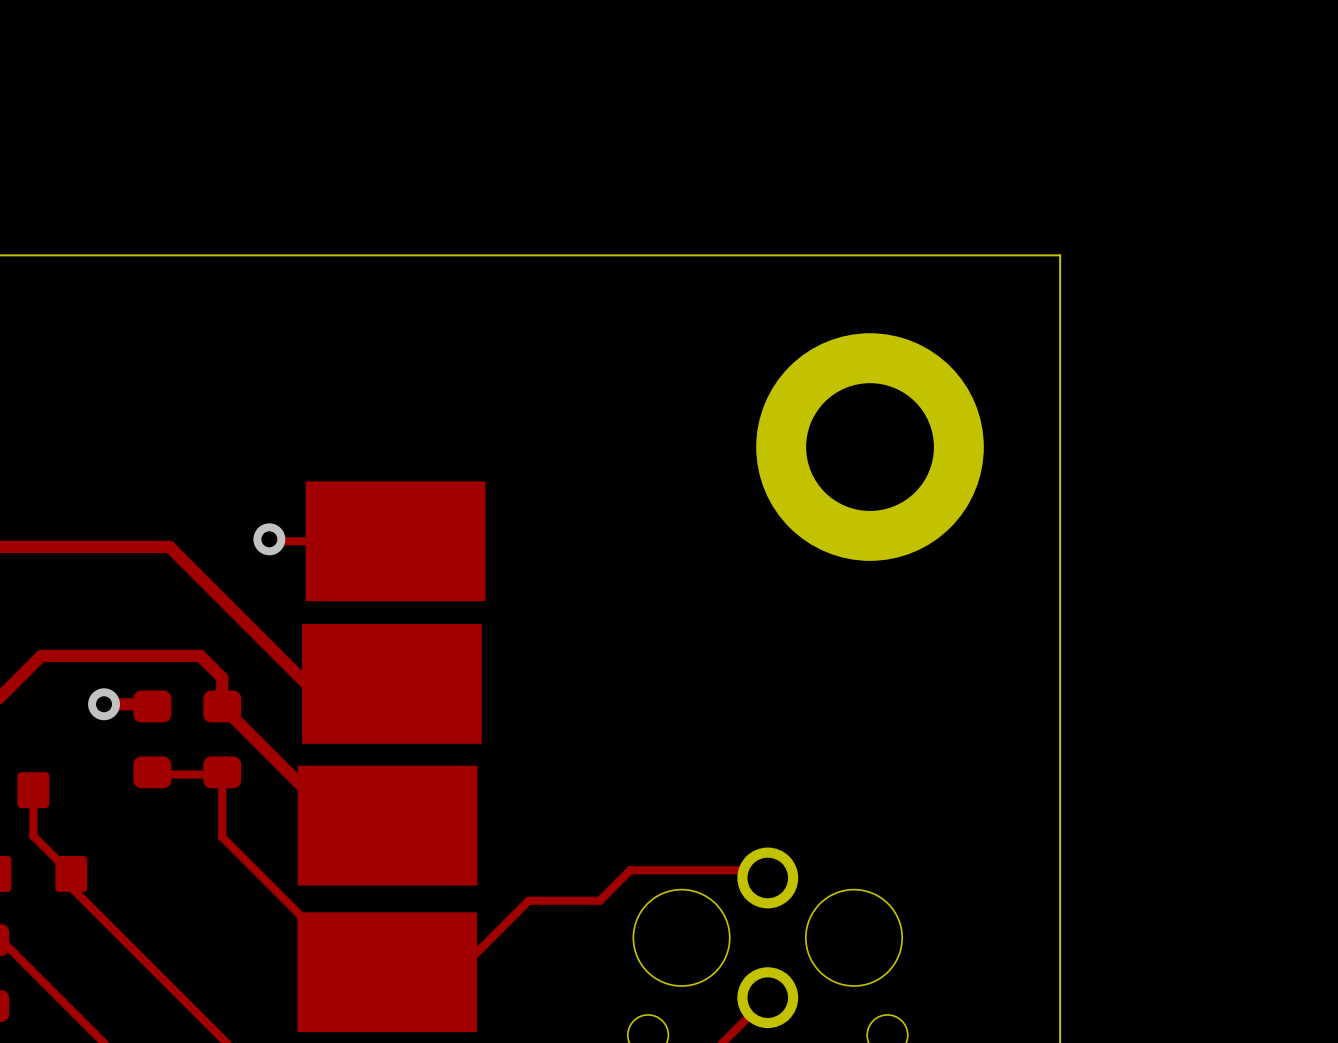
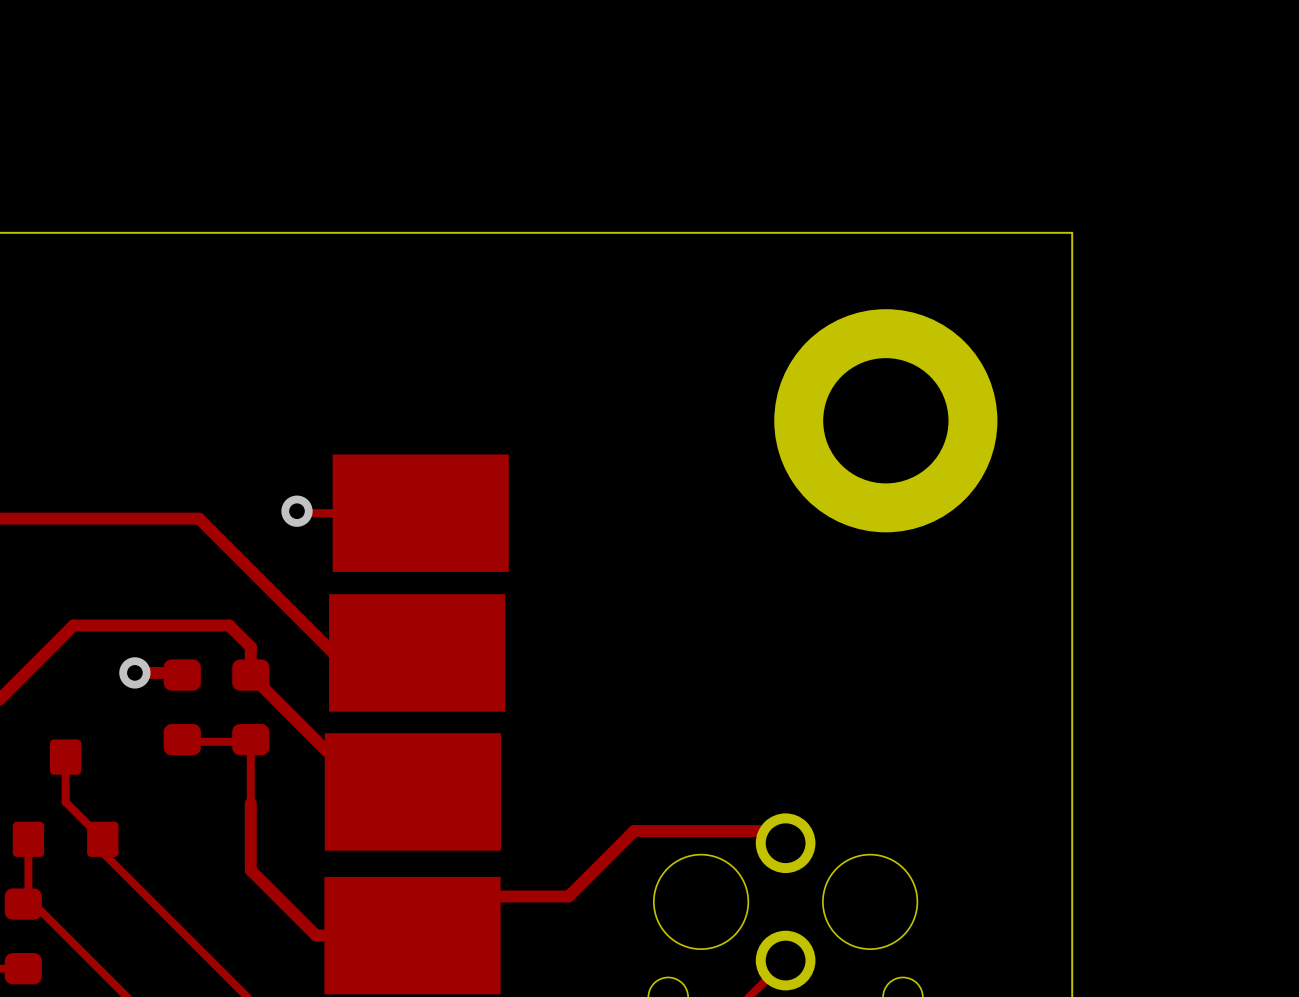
top track: (222, 837) (357, 972) -> (250, 803) (250, 870) (316, 935) (383, 935)
top track: (760, 870) (630, 870) (599, 900) (528, 900) (457, 972) (387, 972) -> (778, 835) (773, 831) (634, 831) (568, 896) (451, 896) (412, 935)

